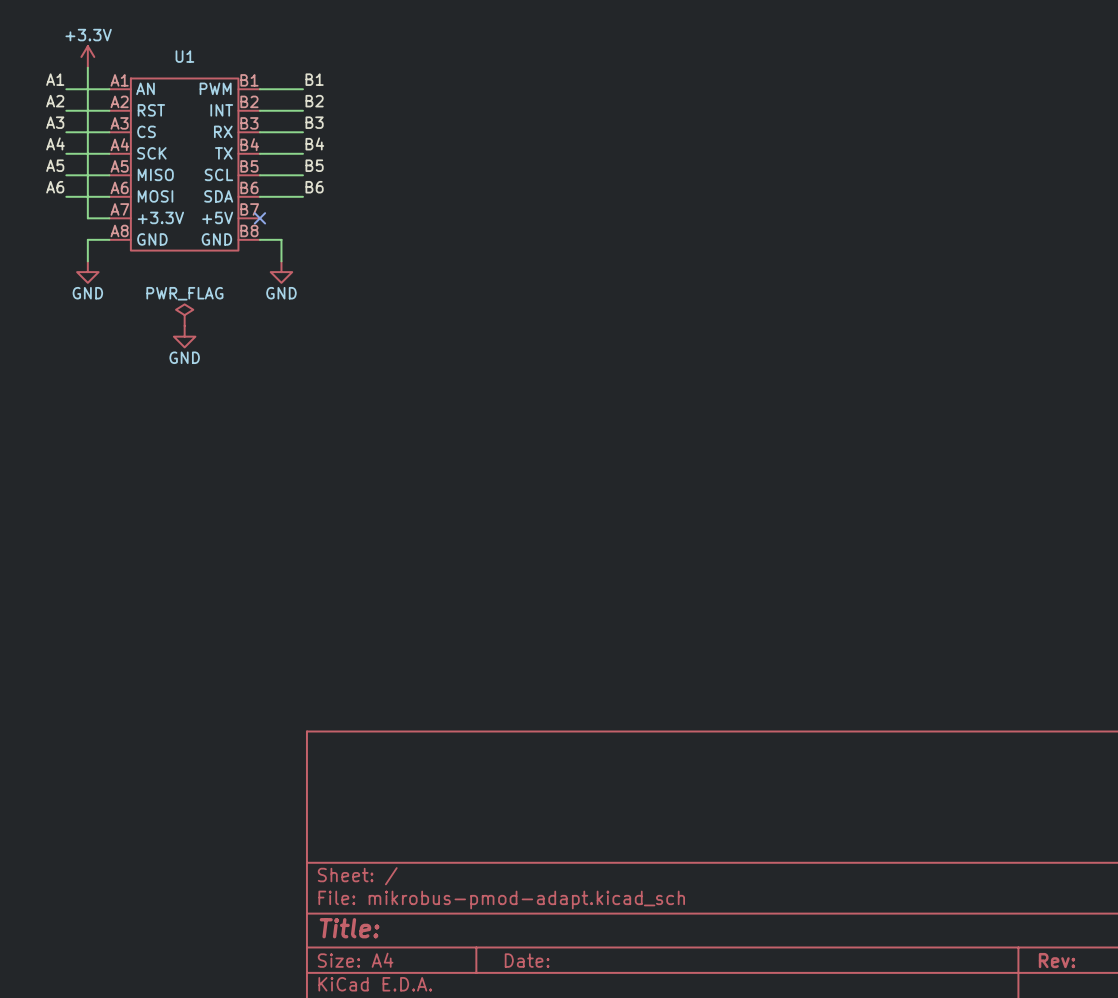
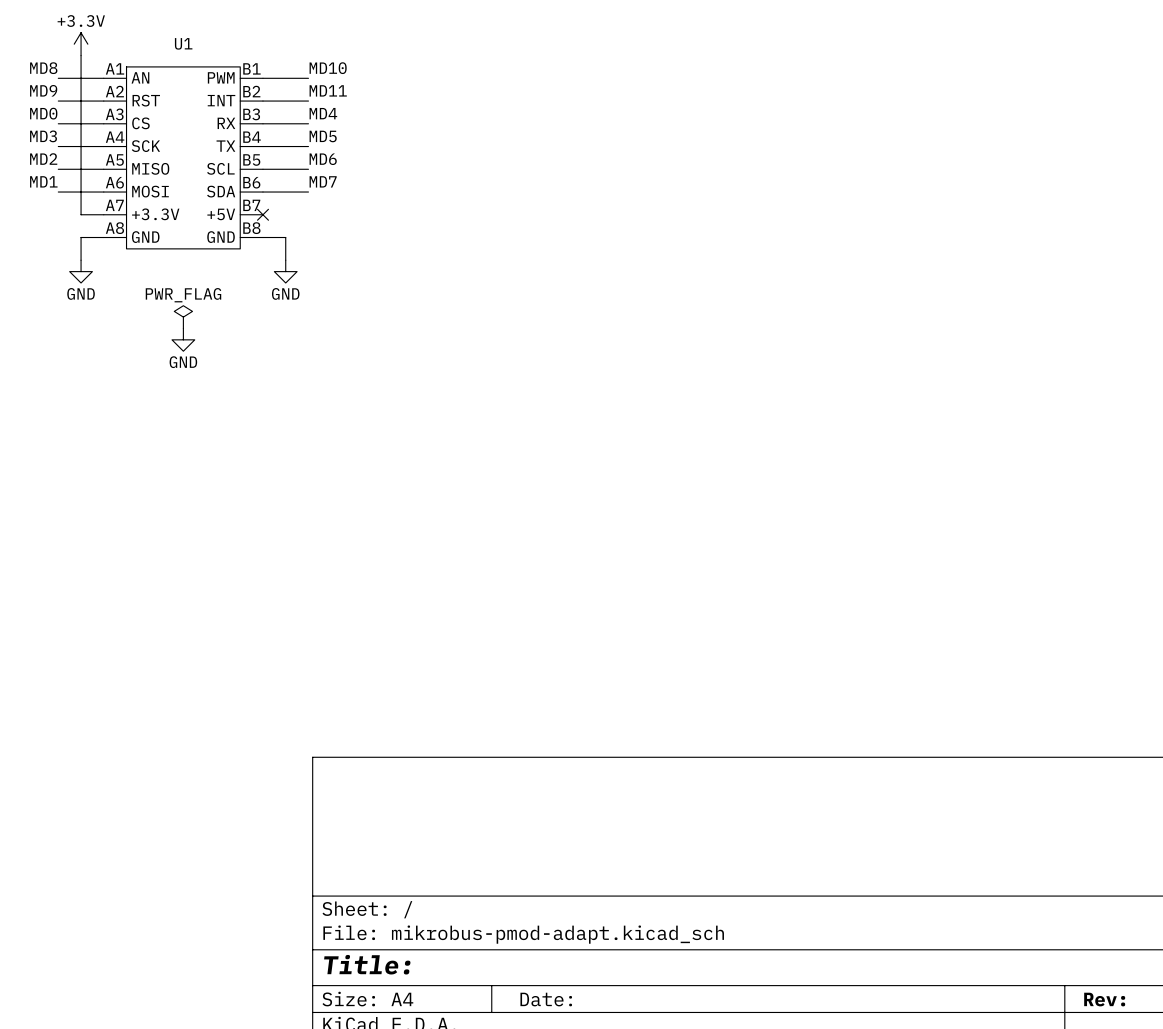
label: A1 (55, 79) -> MD8 (43, 68)
label: B1 (314, 79) -> MD10 (328, 68)
label: A2 (55, 101) -> MD9 (43, 90)
label: B2 (314, 101) -> MD11 (328, 90)
label: A3 (55, 122) -> MD0 (43, 113)
label: B3 (314, 122) -> MD4 (323, 113)
label: A4 (55, 143) -> MD3 (43, 136)
label: B4 (314, 143) -> MD5 (323, 136)
label: A5 (55, 165) -> MD2 (43, 159)
label: B5 (314, 165) -> MD6 (323, 159)
label: A6 (55, 187) -> MD1 (43, 181)
label: B6 (314, 187) -> MD7 (323, 181)

